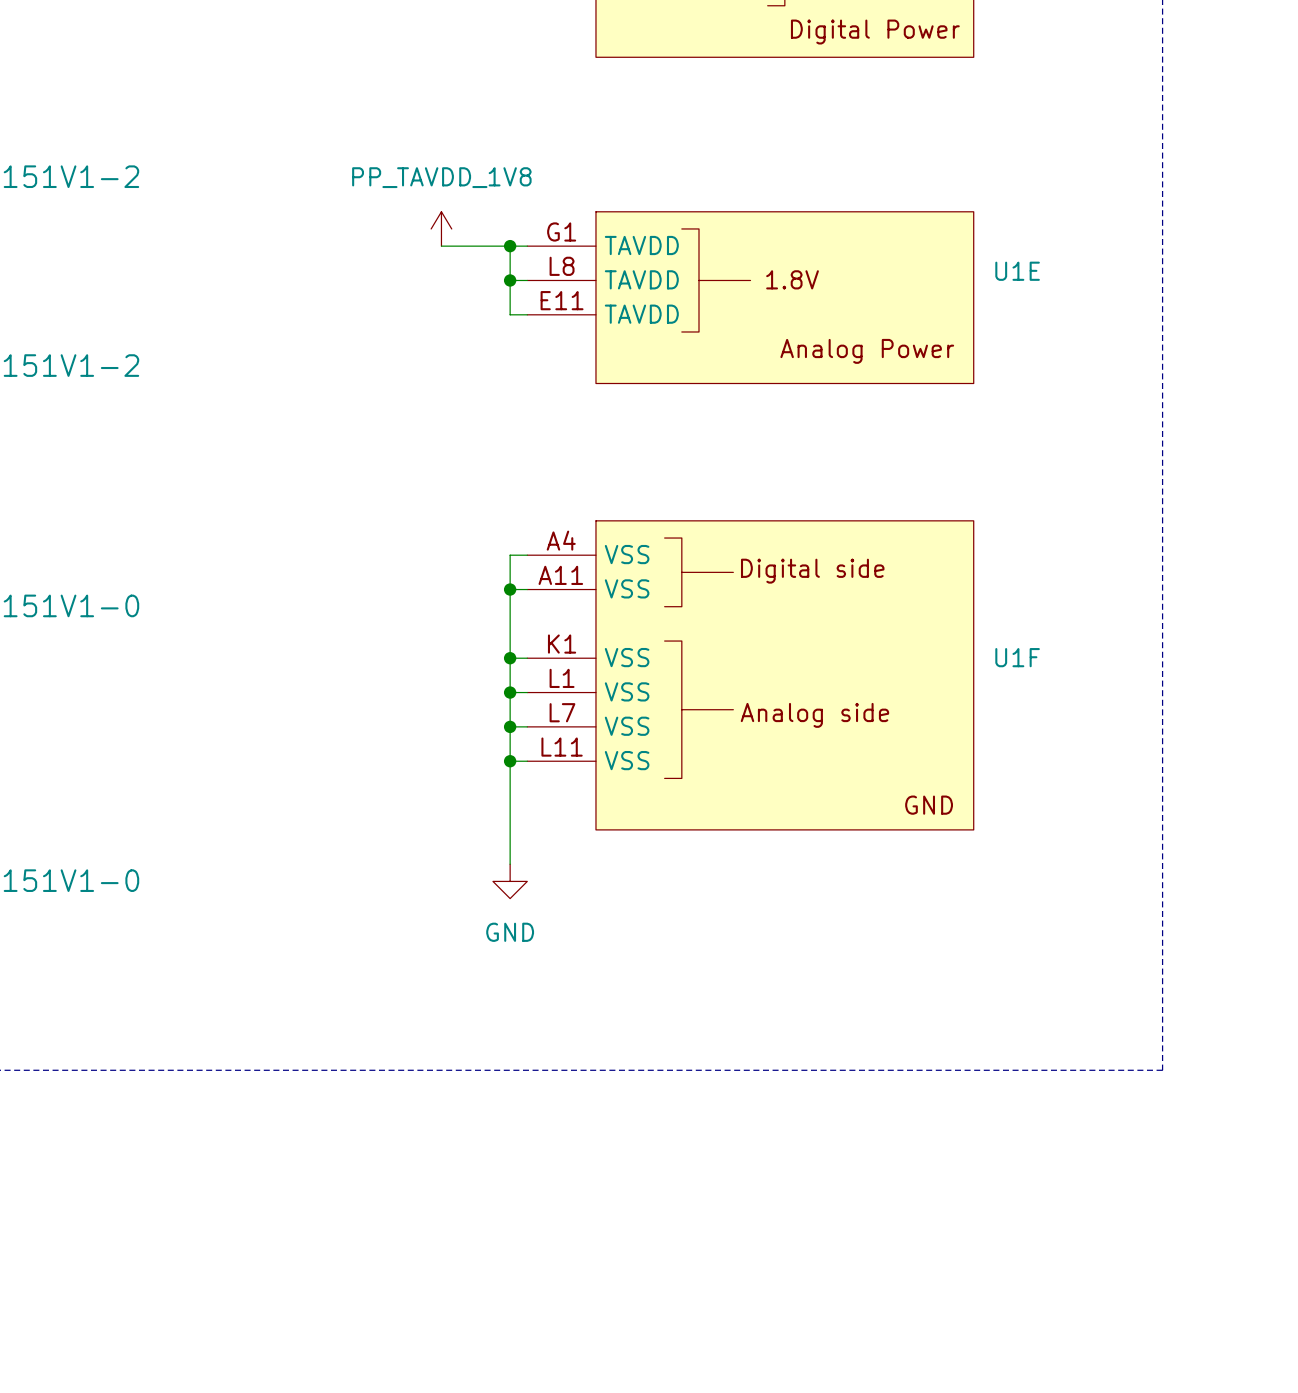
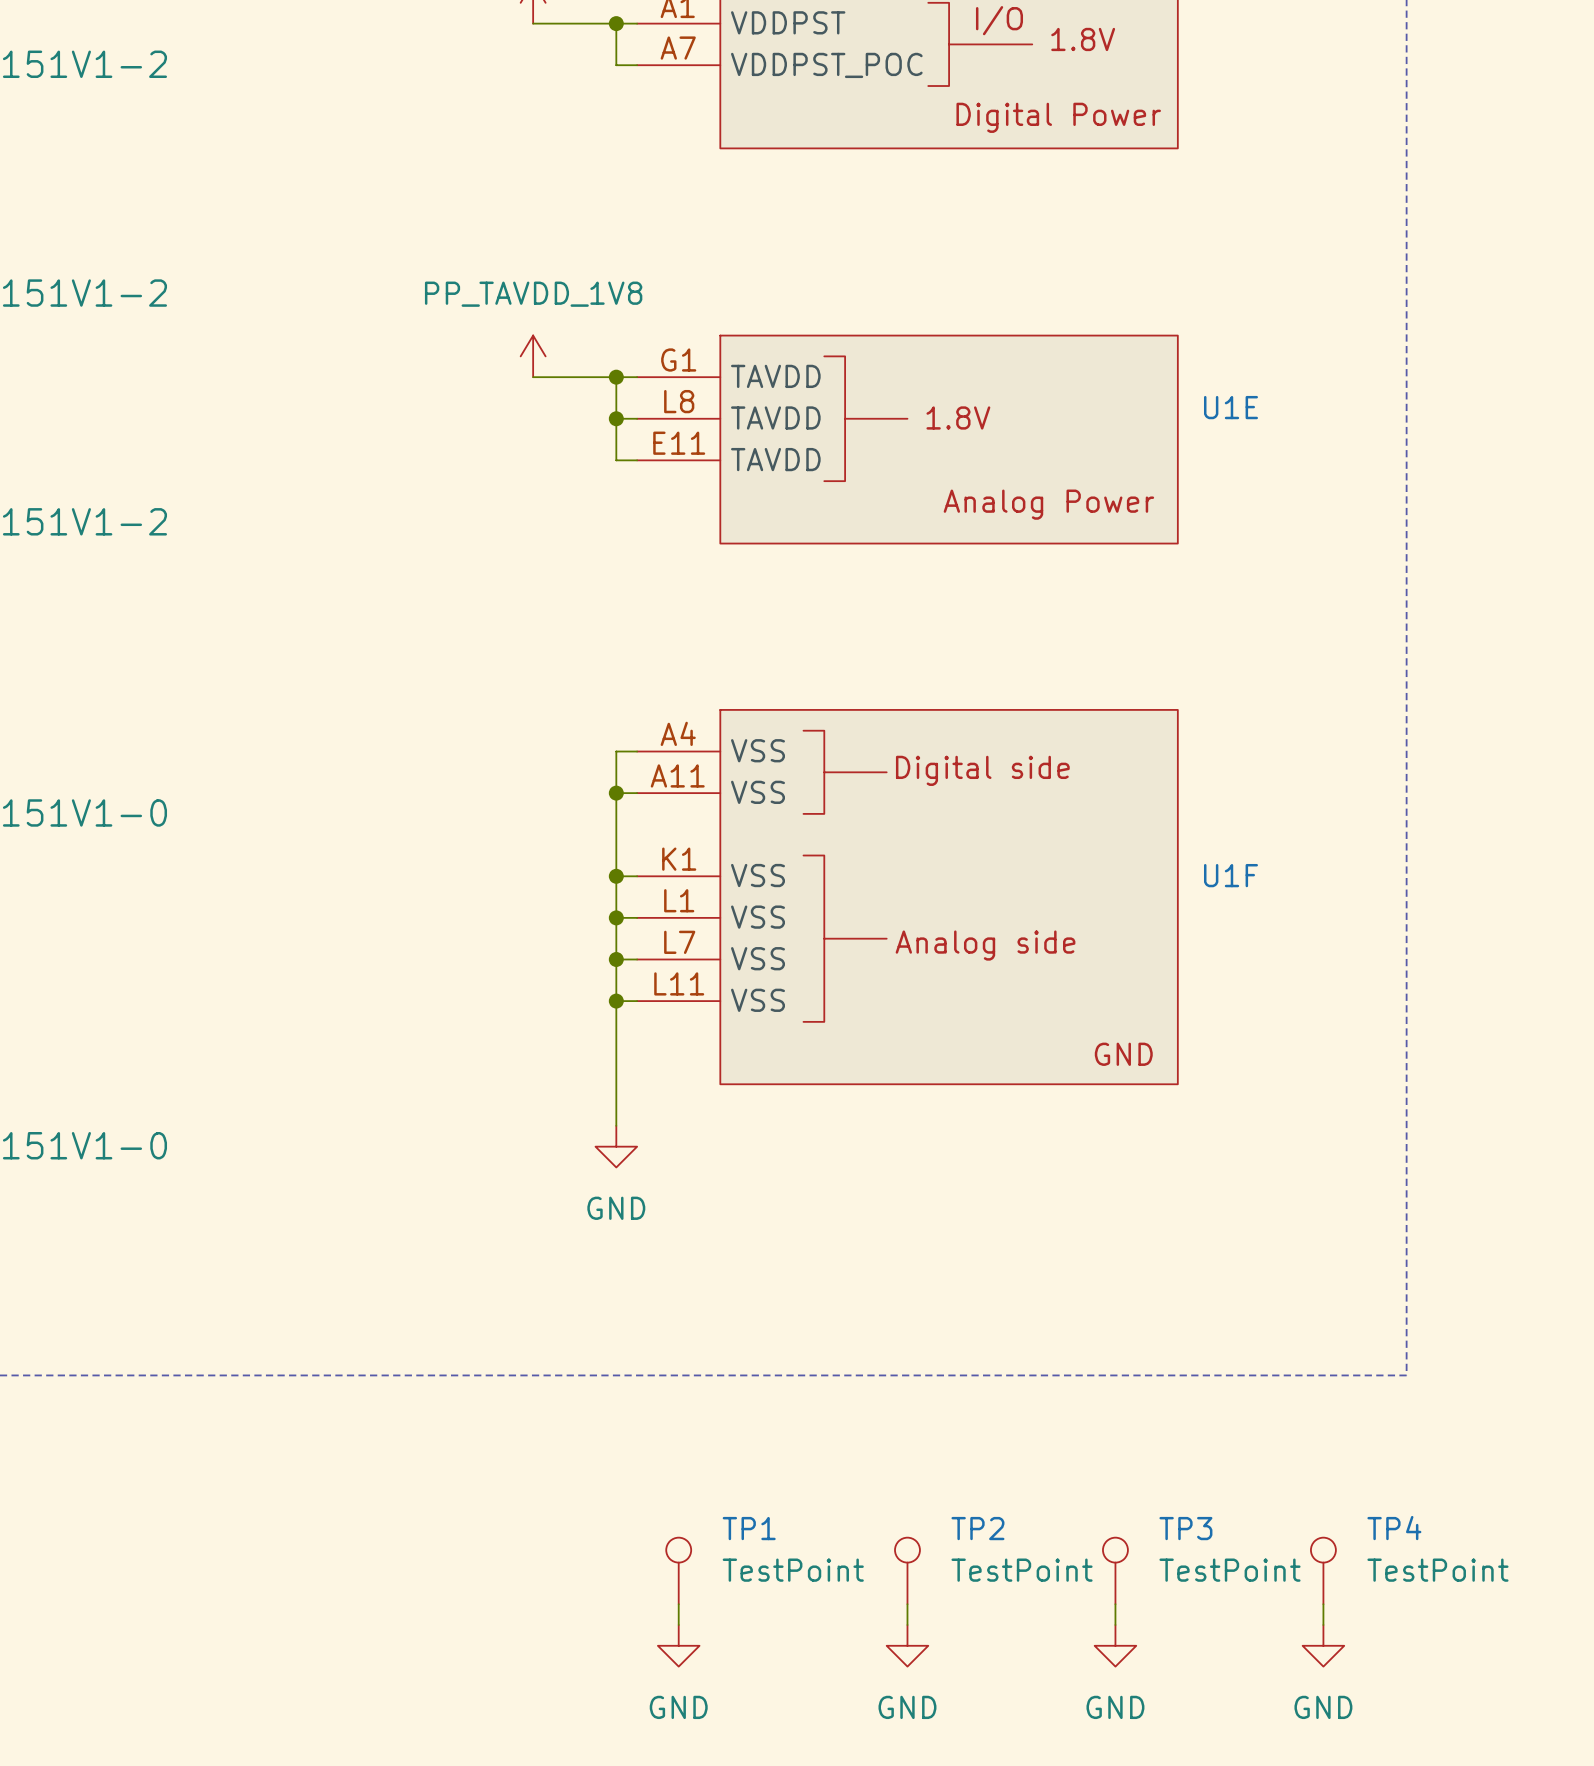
TP1: none -> TestPoint (678, 1570)
TP2: none -> TestPoint (907, 1570)
TP3: none -> TestPoint (1115, 1570)
TP4: none -> TestPoint (1323, 1570)
wire: none -> (678, 1604) (678, 1625)
wire: none -> (907, 1604) (907, 1625)
wire: none -> (1115, 1604) (1115, 1625)
wire: none -> (1323, 1604) (1323, 1625)
power symbol: none -> GND (678, 1645)
power symbol: none -> GND (907, 1645)
power symbol: none -> GND (1115, 1645)
power symbol: none -> GND (1323, 1645)

